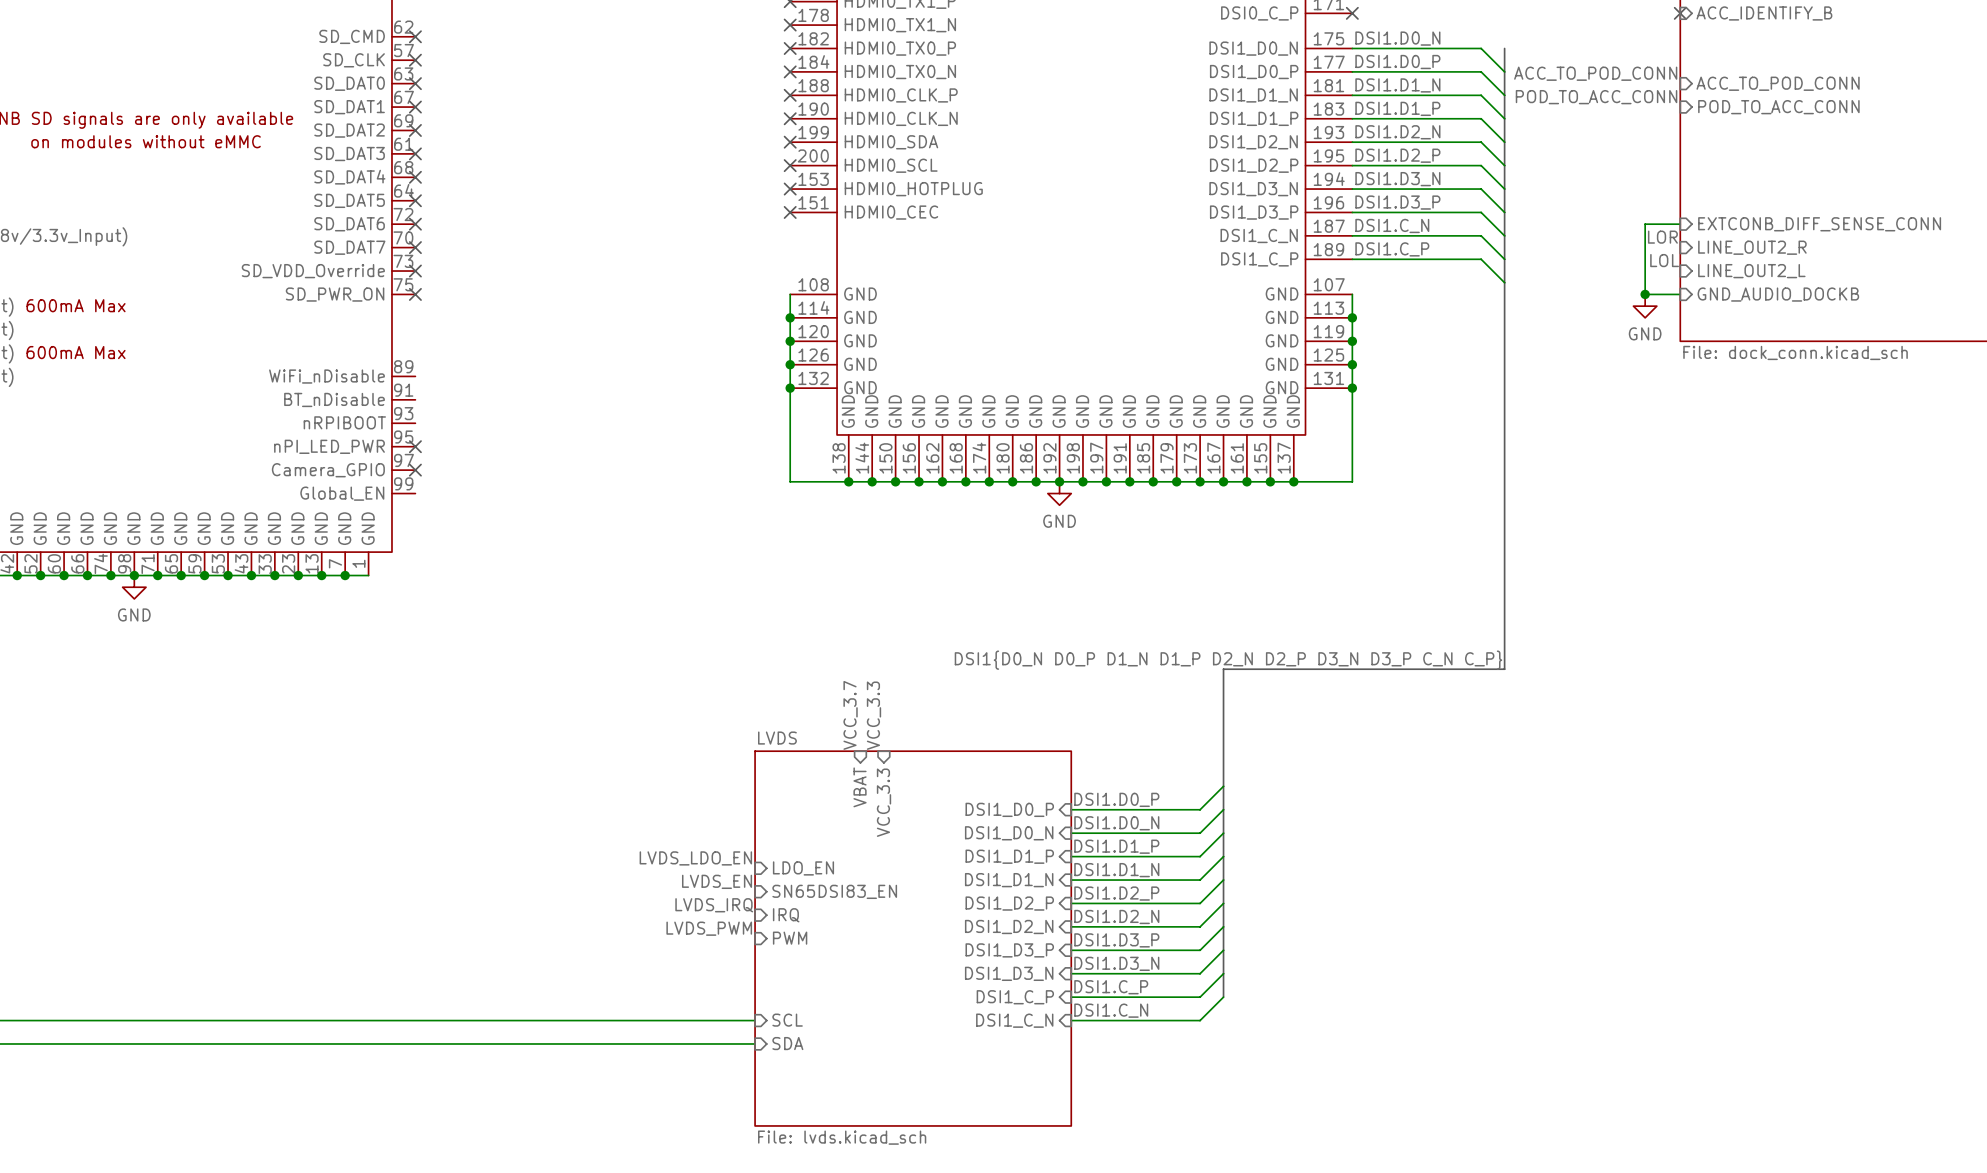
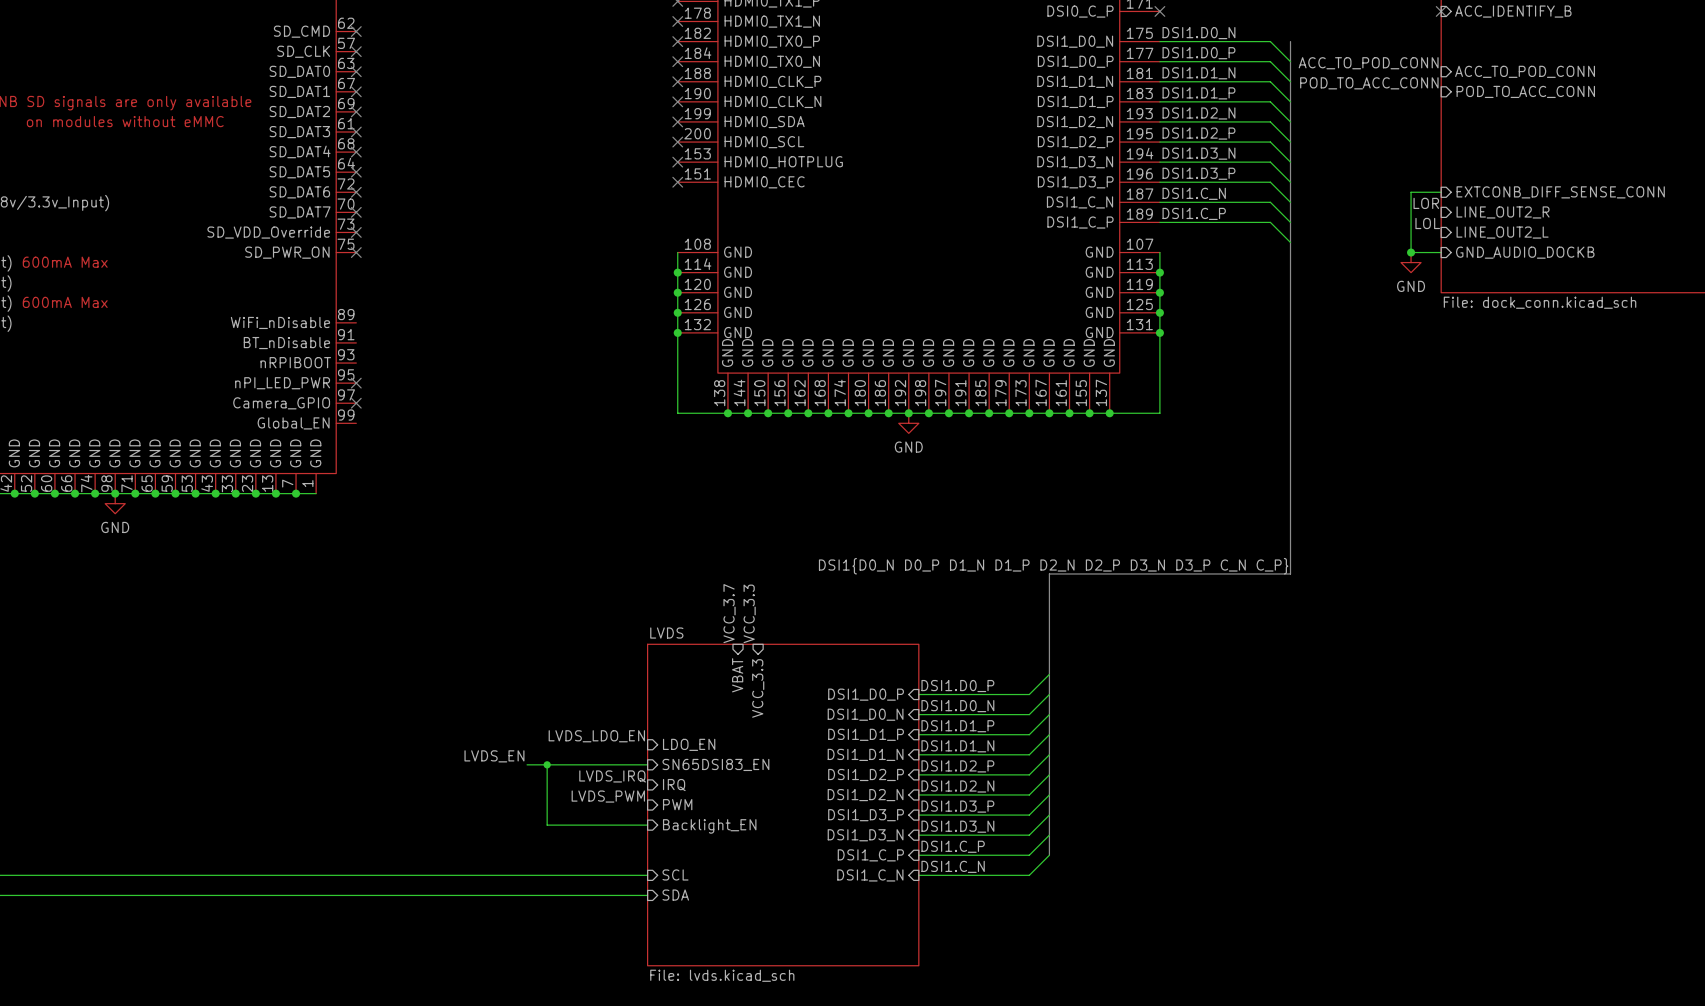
label position: LVDS_EN (717, 881) -> LVDS_EN (494, 756)
wire: none -> (527, 764) (647, 764)
wire: none -> (547, 764) (547, 825) (647, 825)
junction: none -> (547, 764)
sheet pin: none -> Backlight_EN (709, 826)

